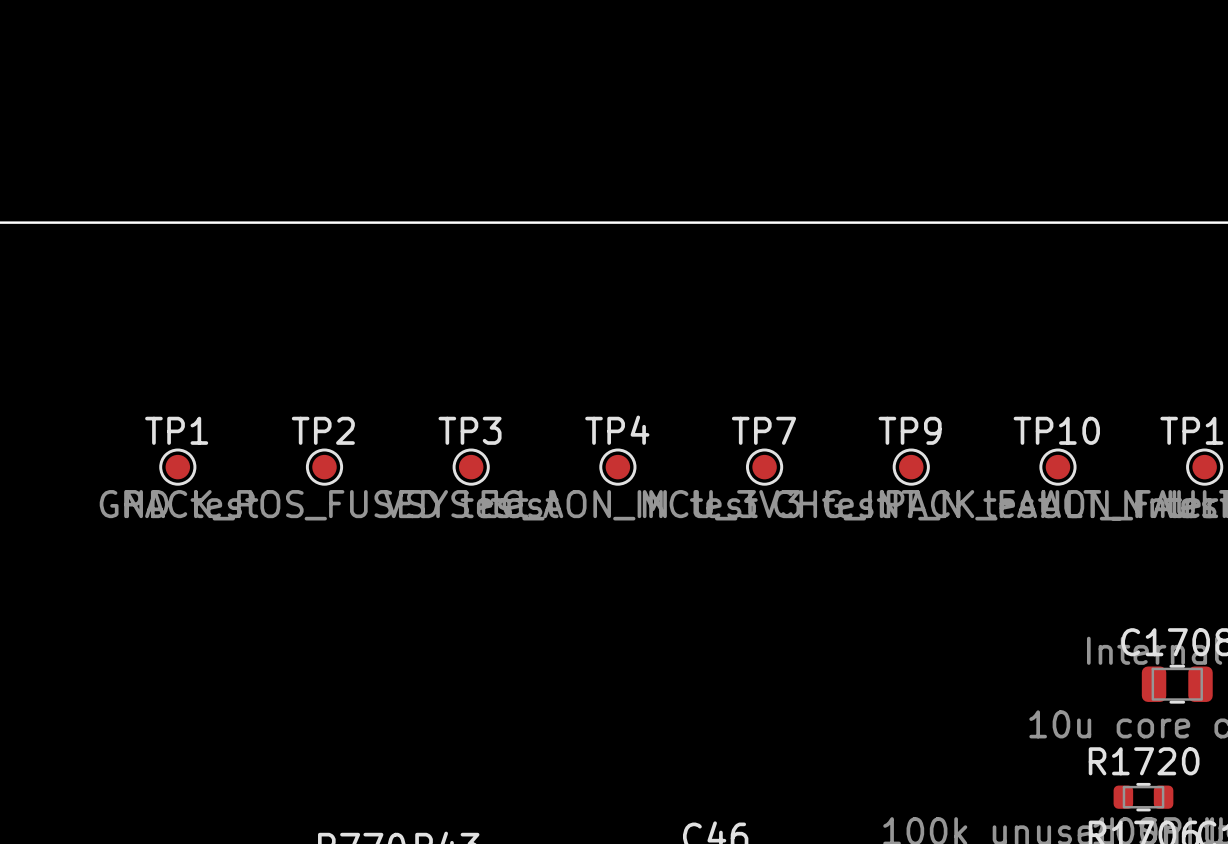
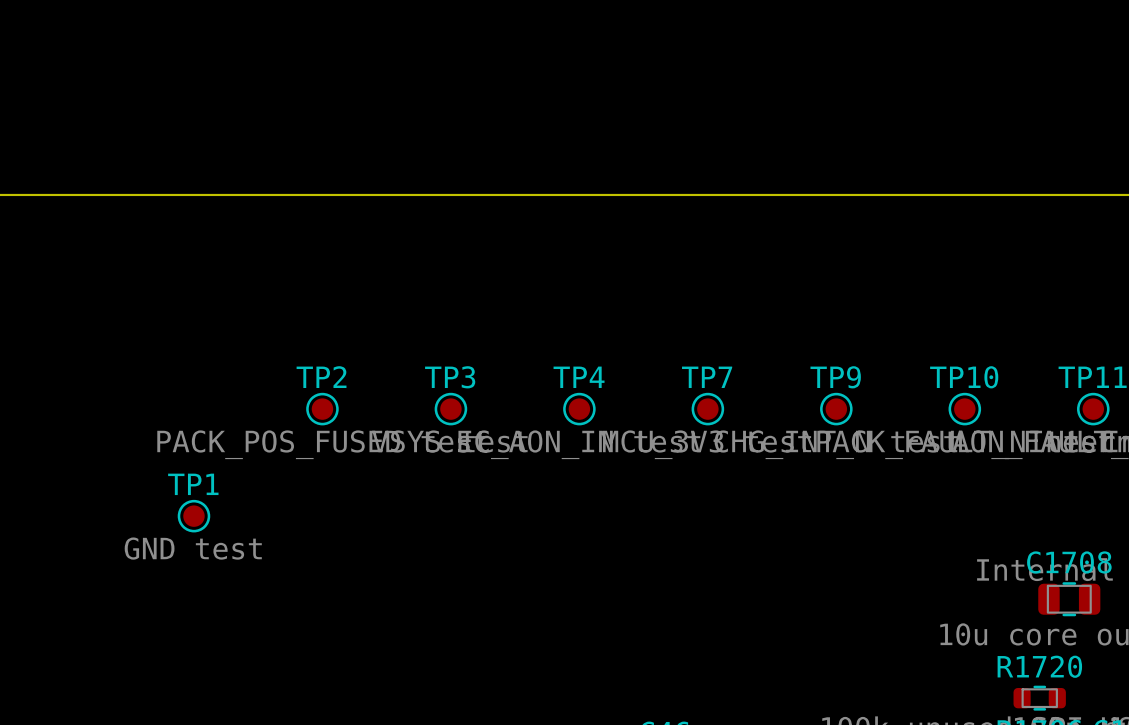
TP1 position: (177, 467) -> (193, 516)

